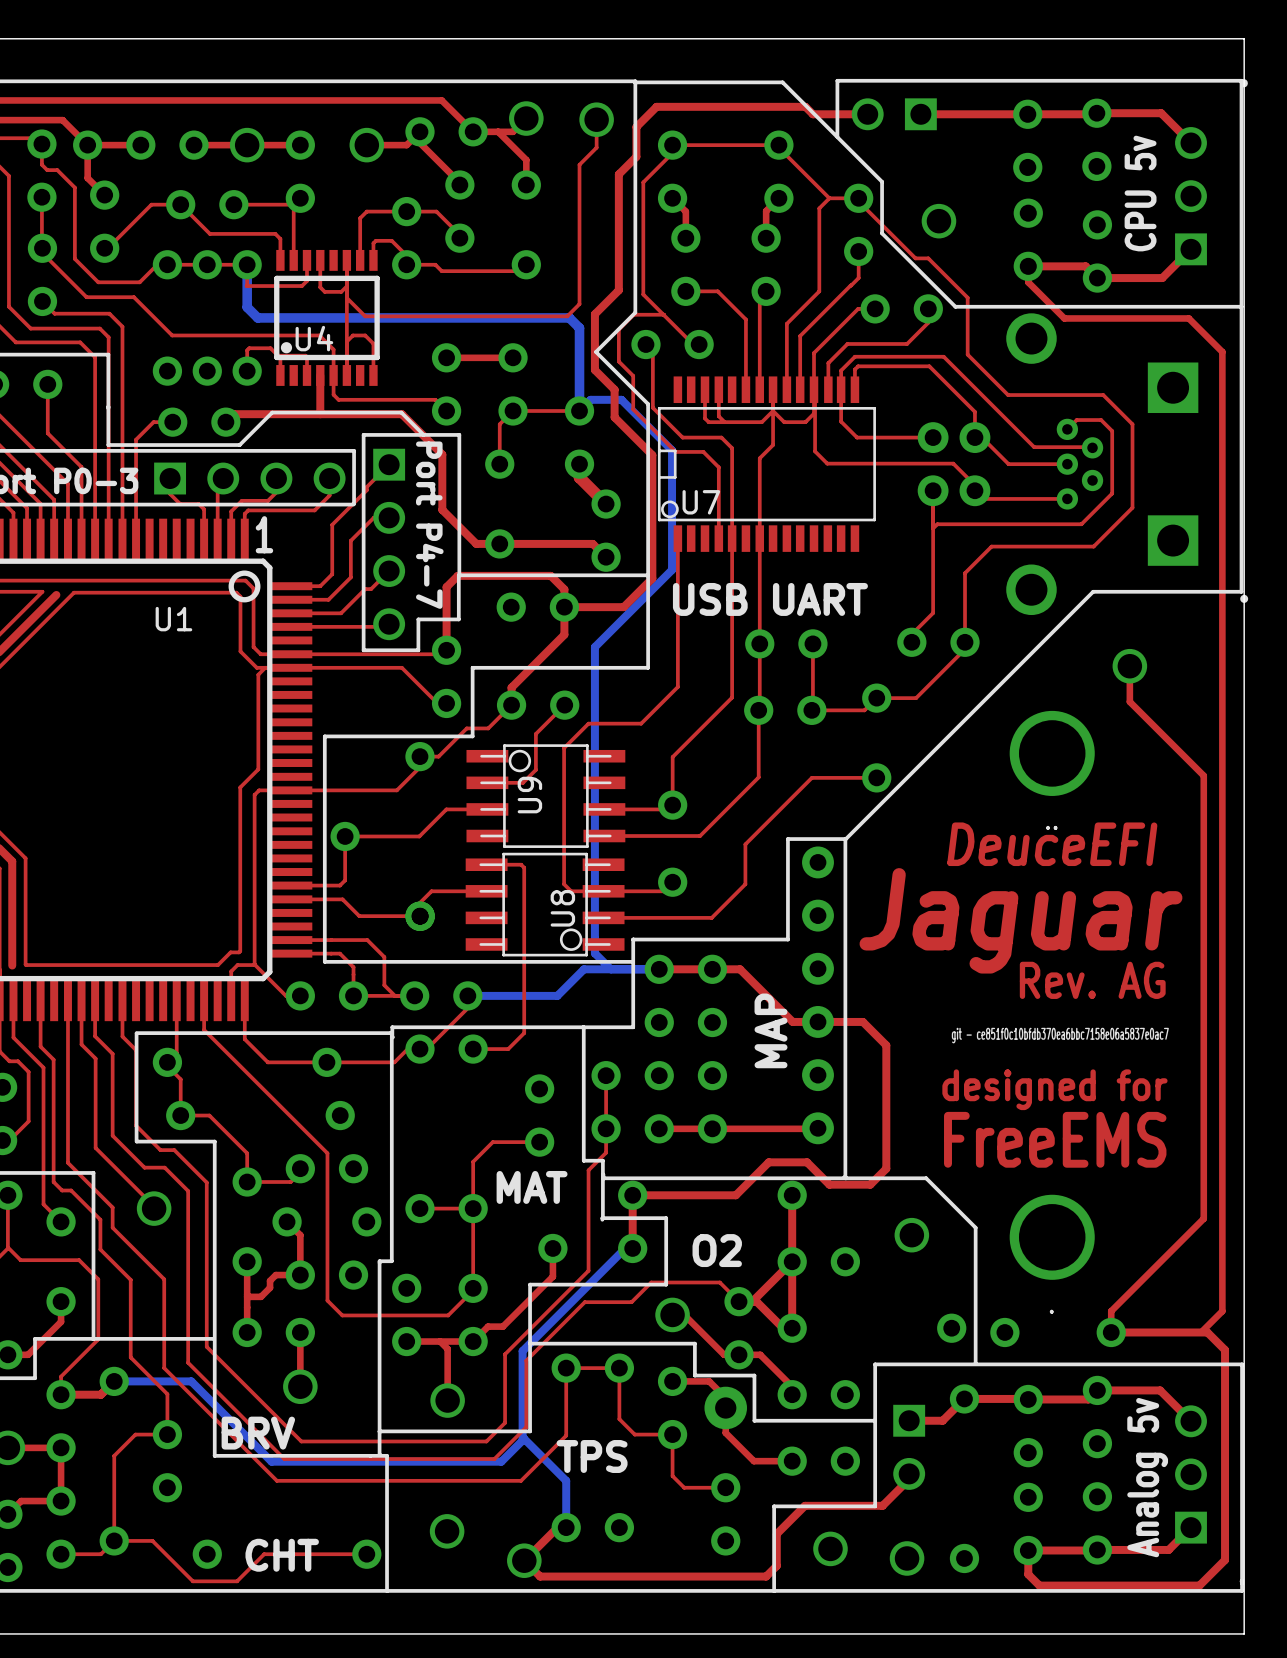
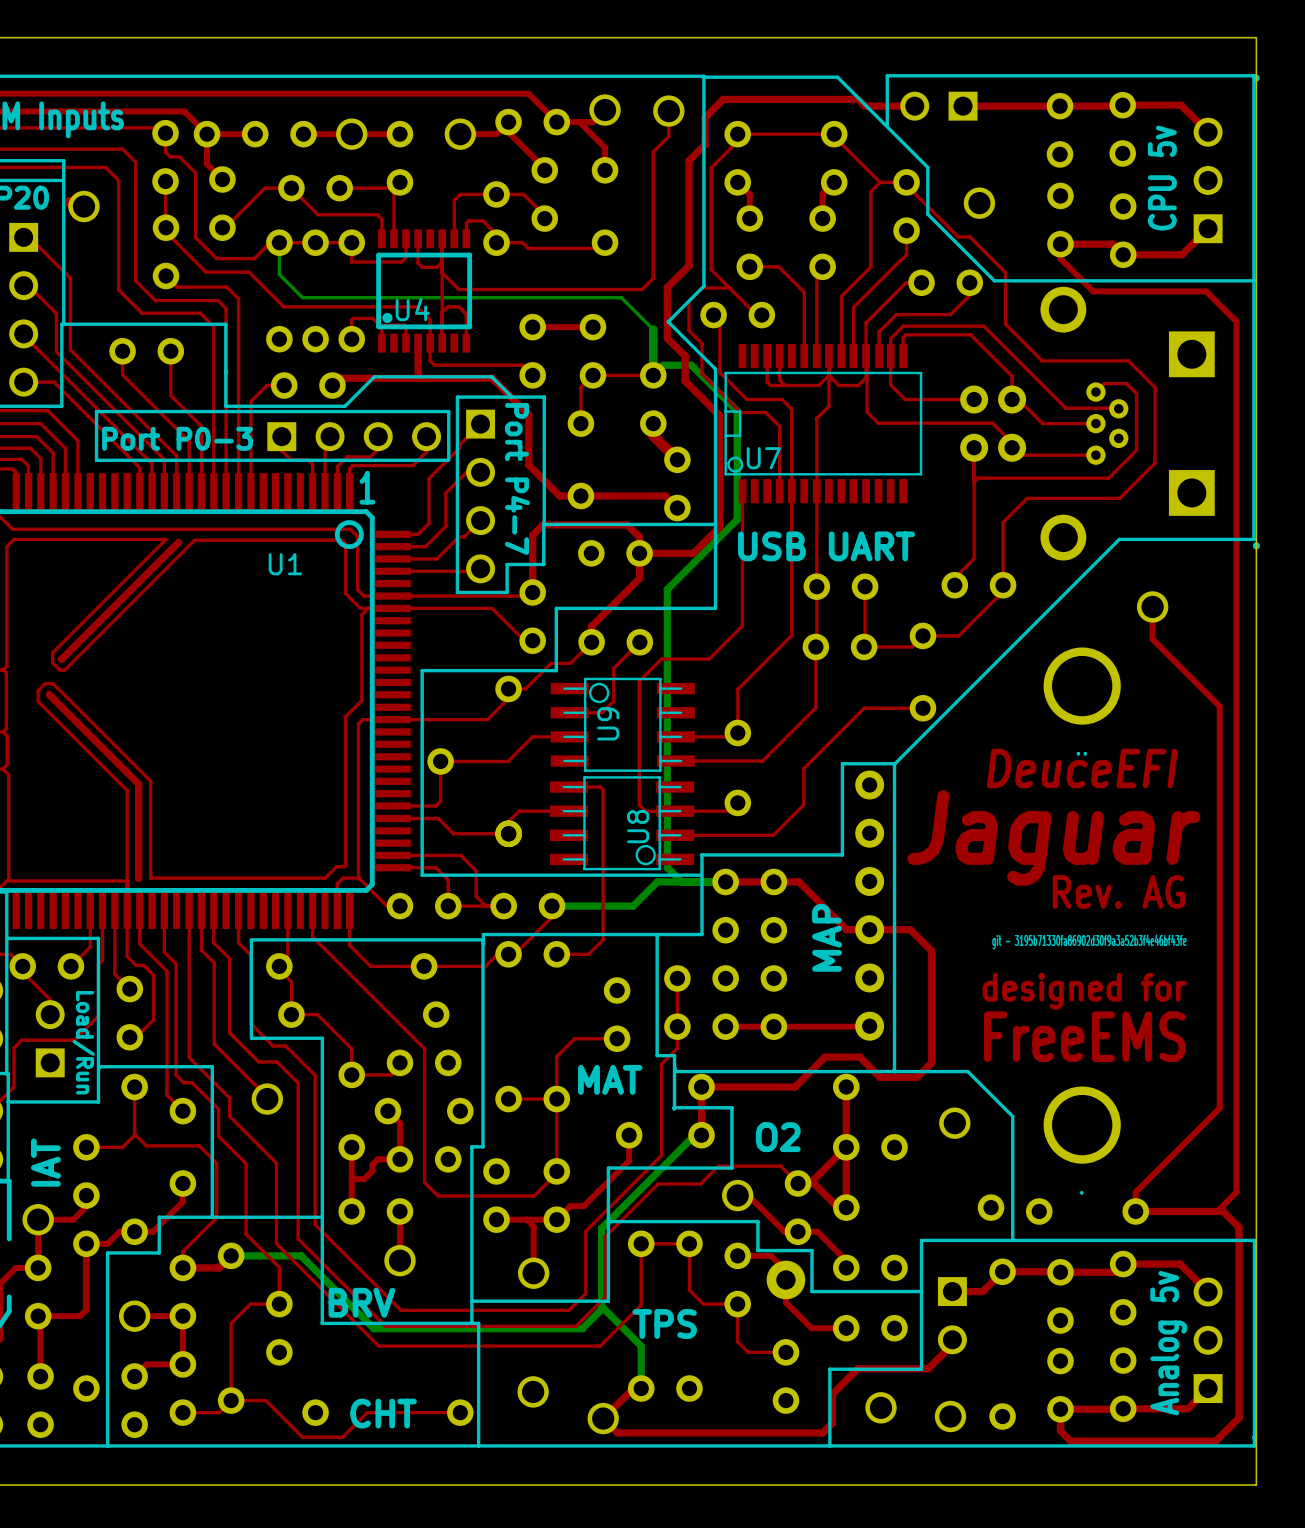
bottom track: (247, 264) (247, 307) (257, 317) (569, 317) (579, 328) (579, 360) -> (279, 242) (279, 274) (302, 297) (621, 297) (653, 329)
text: git - ce851f0c10bfdb370ea6bbc7158e06a5837e0ac7 (1060, 1035) -> git - 3195b71330fa86902d30f9a3a52b3f4e46bf43fe (1089, 941)

